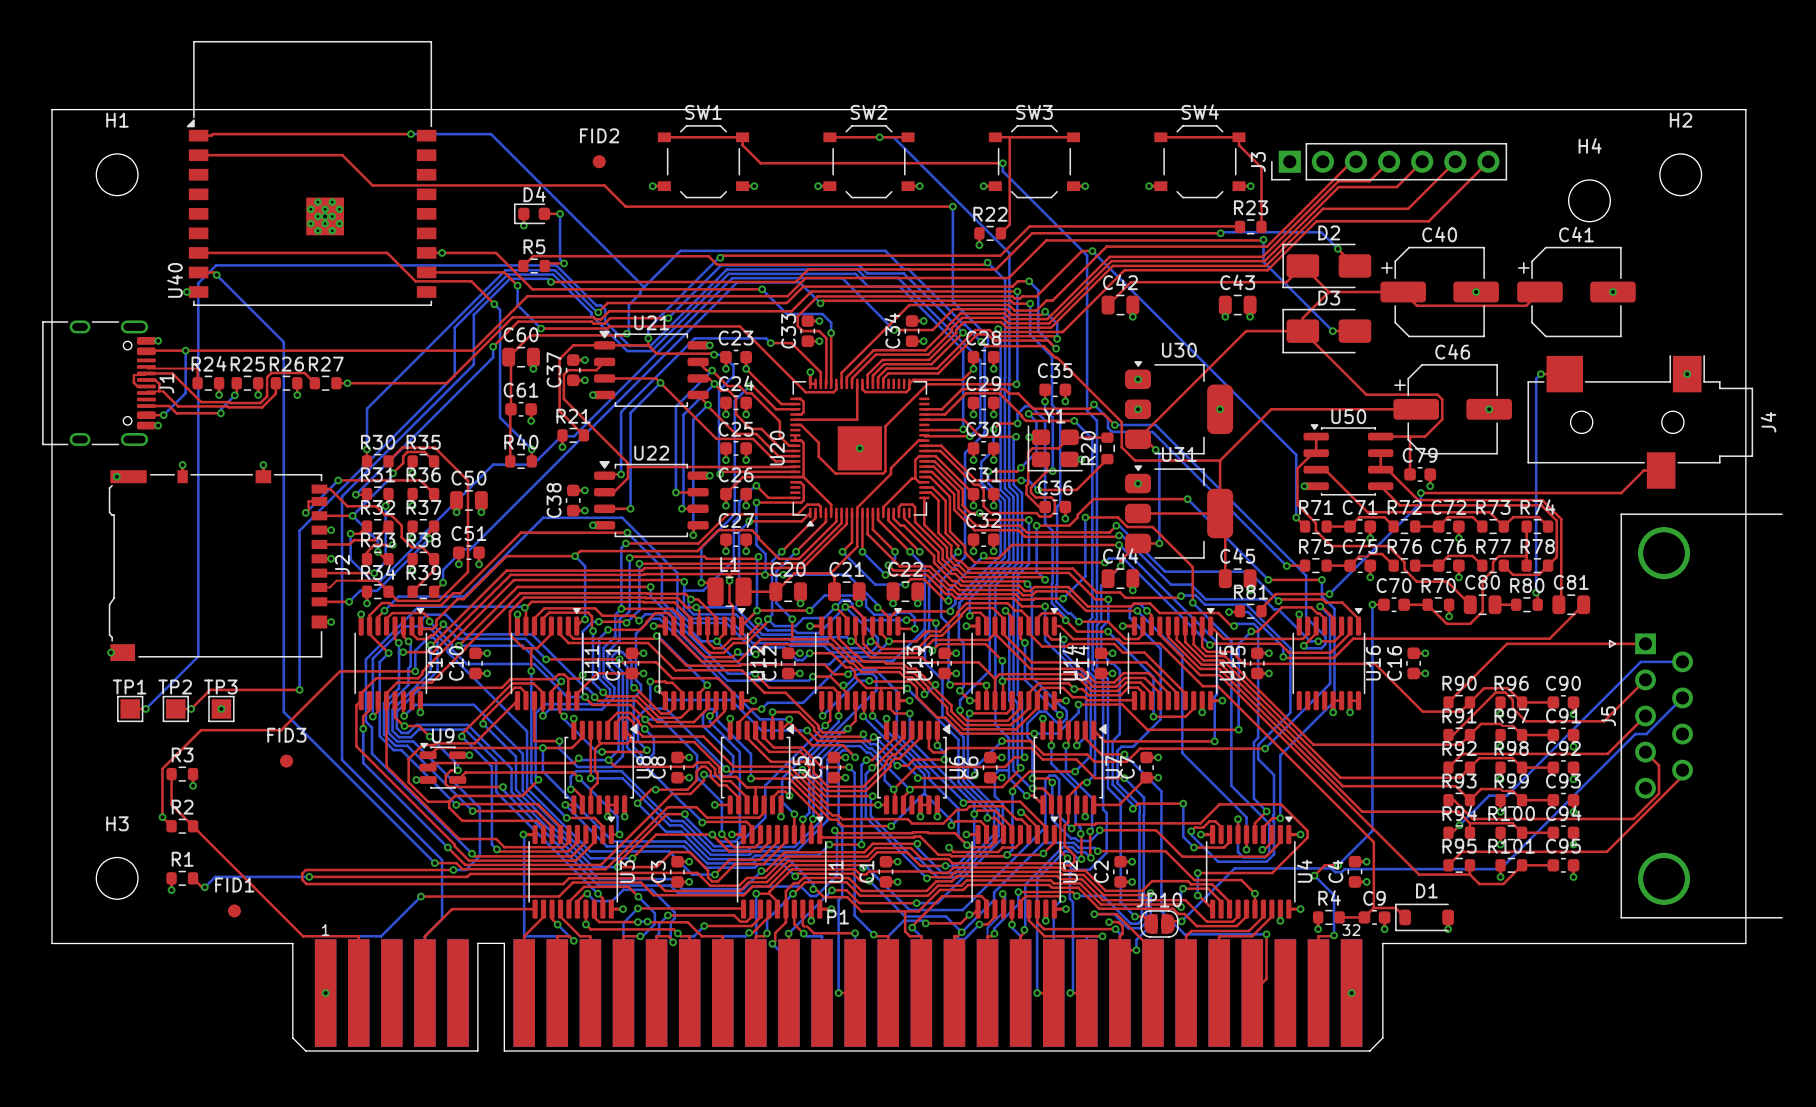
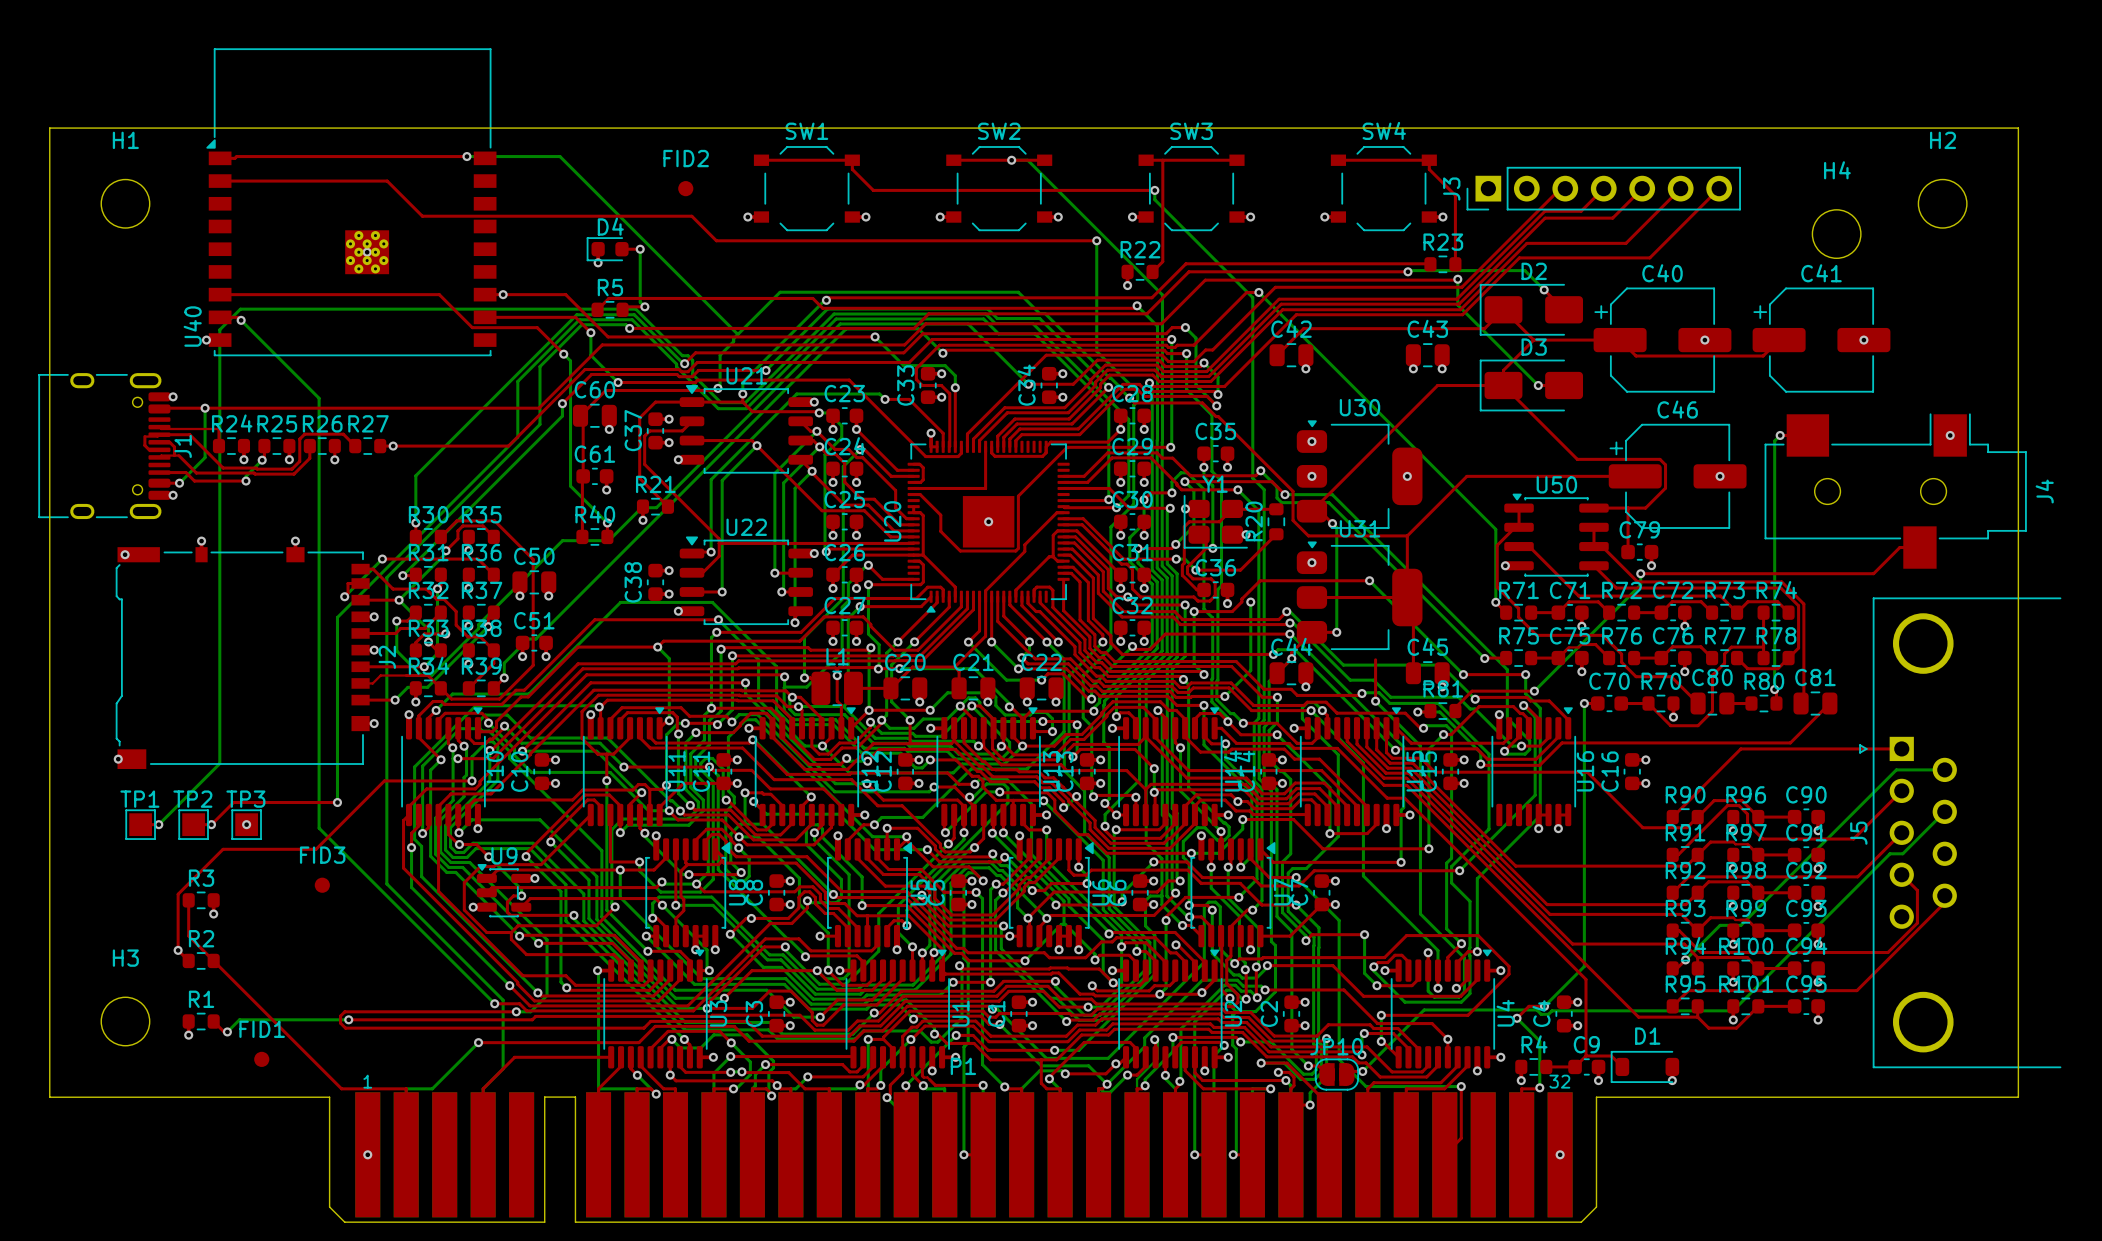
top track: (1085, 517) (1117, 517) (1127, 527) (1152, 527) (1192, 567) -> none

